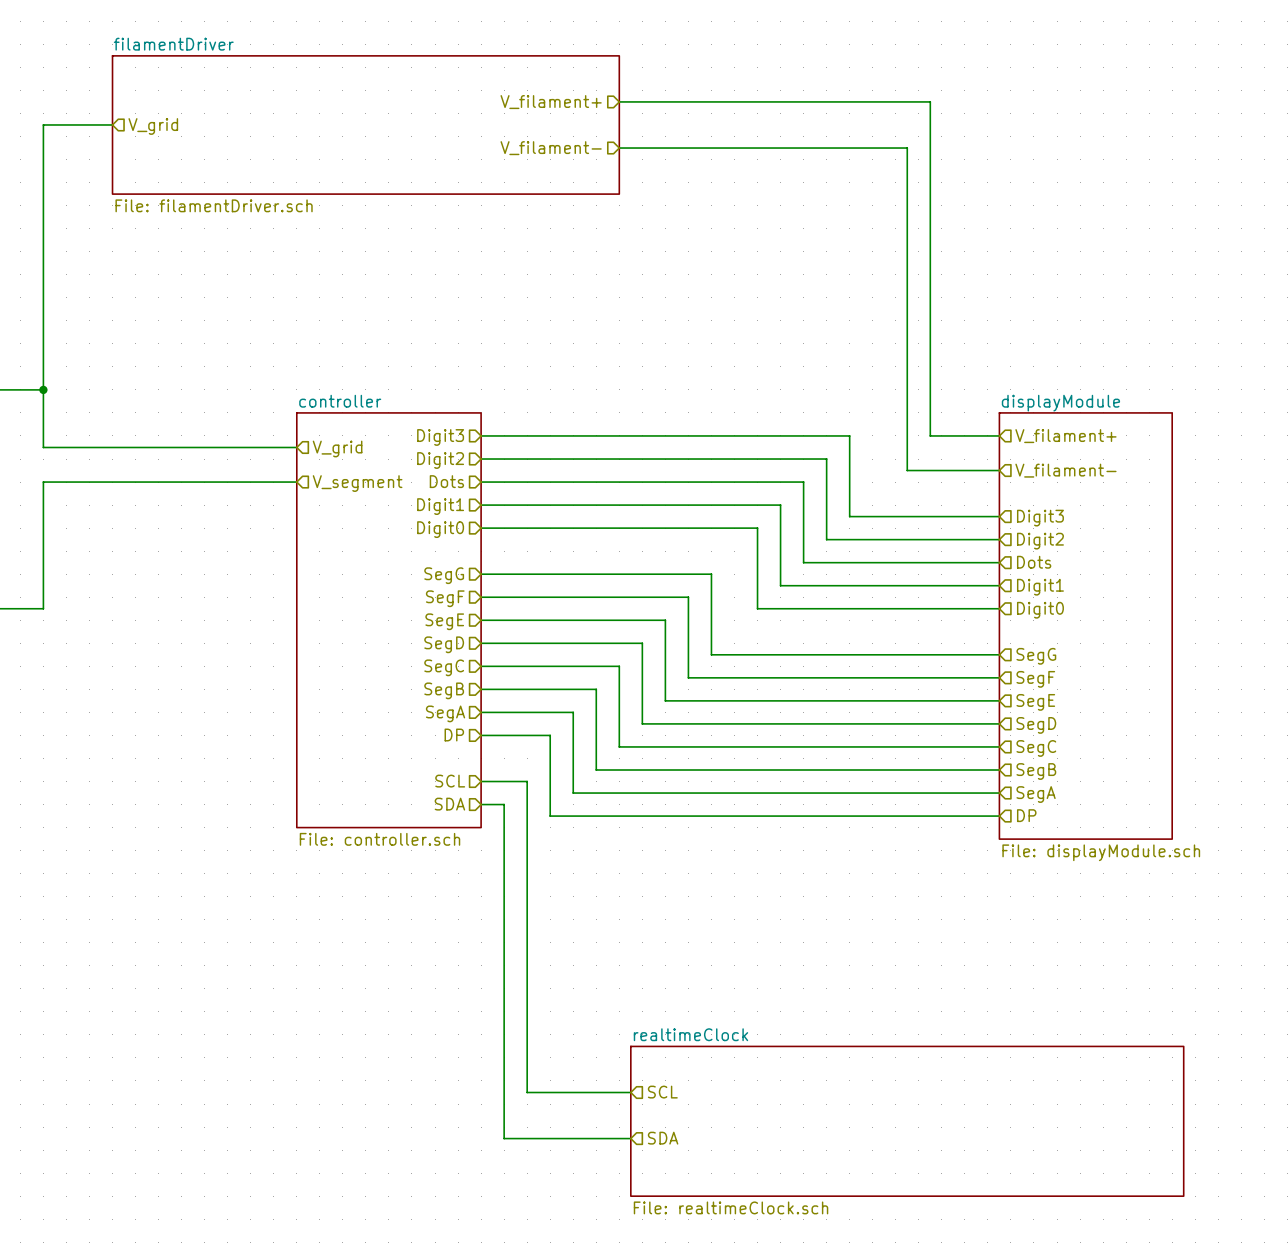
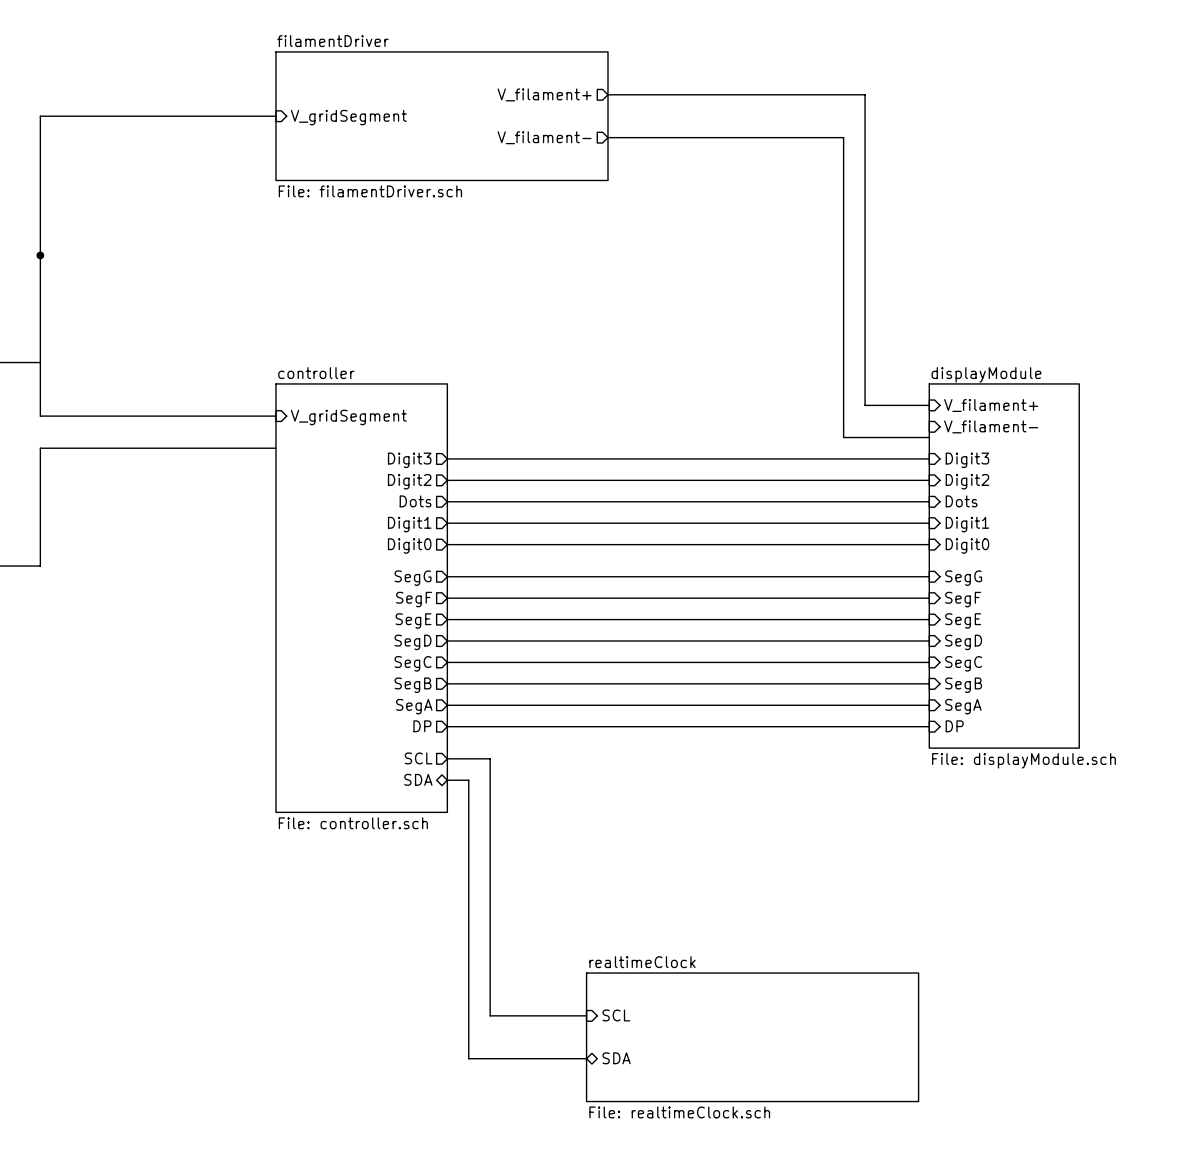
wire: (619, 101) (653, 101) -> none
hierarchical label: V_filament+ (551, 102) -> none
sheet pin: none -> V_filament+ (544, 94)
wire: none -> (104, 116) (275, 116)
sheet filamentDriver: File: filamentDriver.sch (365, 124) -> none
sheet filamentDriver: none -> File: filamentDriver.sch (441, 116)
hierarchical label: V_grid (153, 126) -> none
sheet pin: none -> V_gridSegment (348, 117)
hierarchical label: V_filament- (551, 148) -> none
sheet pin: none -> V_filament- (544, 137)
wire: (619, 148) (653, 148) -> none
junction: none -> (40, 255)
junction: (43, 389) -> none
wire: (481, 435) (849, 435) (849, 516) -> (447, 480) (790, 480)
hierarchical label: V_filament+ (1065, 436) -> none
sheet pin: none -> V_filament+ (991, 405)
hierarchical label: Digit3 (440, 437) -> none
hierarchical label: V_grid (337, 448) -> none
sheet pin: none -> V_gridSegment (348, 417)
wire: (481, 459) (826, 459) (826, 539) -> (447, 501) (768, 501)
sheet pin: none -> V_filament- (991, 426)
hierarchical label: Digit2 (440, 460) -> none
hierarchical label: V_filament- (1065, 470) -> none
hierarchical label: Dots (446, 481) -> none
wire: (481, 482) (803, 482) (803, 562) -> (447, 523) (747, 523)
hierarchical label: V_segment (357, 483) -> none
wire: none -> (447, 458) (929, 458)
sheet pin: none -> Digit3 (409, 460)
sheet pin: none -> Digit3 (967, 460)
wire: (481, 505) (780, 505) (780, 585) -> (447, 544) (725, 544)
hierarchical label: Digit1 (440, 506) -> none
sheet pin: none -> Digit2 (409, 481)
hierarchical label: Digit3 (1040, 518) -> none
sheet pin: none -> Digit2 (967, 481)
wire: (481, 528) (757, 528) (757, 608) (999, 608) -> none
hierarchical label: Digit0 (440, 529) -> none
sheet pin: none -> Dots (415, 501)
sheet pin: none -> Dots (961, 501)
hierarchical label: Digit2 (1040, 541) -> none
hierarchical label: Dots (1034, 562) -> none
sheet pin: none -> Digit1 (409, 524)
sheet pin: none -> Digit1 (967, 524)
wire: (481, 574) (711, 574) (711, 654) (999, 654) -> none
hierarchical label: SegG (444, 575) -> none
sheet pin: none -> Digit0 (409, 546)
hierarchical label: Digit1 (1040, 587) -> none
sheet pin: none -> Digit0 (967, 546)
wire: (481, 597) (688, 597) (688, 677) (999, 677) -> none
hierarchical label: SegF (445, 598) -> none
sheet displayModule: none -> File: displayModule.sch (1004, 566)
hierarchical label: Digit0 (1040, 610) -> none
sheet controller: File: controller.sch (388, 620) -> none
wire: (665, 620) (665, 700) (999, 700) -> (618, 576) (929, 576)
hierarchical label: SegE (444, 621) -> none
sheet pin: none -> SegG (413, 578)
sheet pin: none -> SegG (963, 578)
sheet displayModule: File: displayModule.sch (1085, 626) -> none
sheet controller: none -> File: controller.sch (361, 598)
wire: (642, 643) (642, 723) (999, 723) -> (597, 598) (929, 598)
hierarchical label: SegD (444, 644) -> none
sheet pin: none -> SegF (414, 599)
sheet pin: none -> SegF (963, 599)
hierarchical label: SegG (1036, 656) -> none
wire: (619, 666) (619, 746) (999, 746) -> (575, 619) (929, 619)
hierarchical label: SegC (444, 667) -> none
sheet pin: none -> SegE (413, 620)
sheet pin: none -> SegE (963, 620)
hierarchical label: SegF (1035, 679) -> none
wire: (596, 689) (596, 770) (999, 770) -> (554, 641) (929, 641)
hierarchical label: SegB (444, 690) -> none
sheet pin: none -> SegD (413, 642)
sheet pin: none -> SegD (963, 642)
hierarchical label: SegE (1035, 702) -> none
wire: (573, 712) (573, 793) (999, 793) -> (533, 662) (929, 662)
sheet pin: none -> SegC (413, 663)
hierarchical label: SegA (445, 713) -> none
sheet pin: none -> SegC (963, 663)
hierarchical label: SegD (1036, 725) -> none
hierarchical label: DP (454, 735) -> none
wire: (550, 735) (550, 816) (999, 816) -> (511, 683) (929, 683)
sheet pin: none -> SegB (413, 685)
sheet pin: none -> SegB (963, 685)
hierarchical label: SegC (1036, 748) -> none
wire: none -> (447, 705) (929, 705)
sheet pin: none -> SegA (414, 706)
sheet pin: none -> SegA (963, 706)
hierarchical label: SegB (1036, 771) -> none
hierarchical label: SCL (450, 781) -> none
sheet pin: none -> DP (422, 726)
wire: (527, 781) (527, 816) -> (447, 758) (490, 758)
wire: none -> (490, 726) (929, 726)
sheet pin: none -> DP (954, 726)
hierarchical label: SegA (1036, 794) -> none
hierarchical label: SDA (449, 804) -> none
wire: (481, 804) (504, 804) (504, 839) -> (447, 780) (468, 780)
sheet pin: none -> SCL (418, 758)
hierarchical label: DP (1026, 815) -> none
sheet pin: none -> SDA (418, 779)
hierarchical label: SCL (662, 1092) -> none
sheet pin: none -> SCL (616, 1015)
sheet realtimeClock: none -> File: realtimeClock.sch (752, 1037)
sheet realtimeClock: File: realtimeClock.sch (907, 1121) -> none
hierarchical label: SDA (663, 1138) -> none
sheet pin: none -> SDA (616, 1058)

